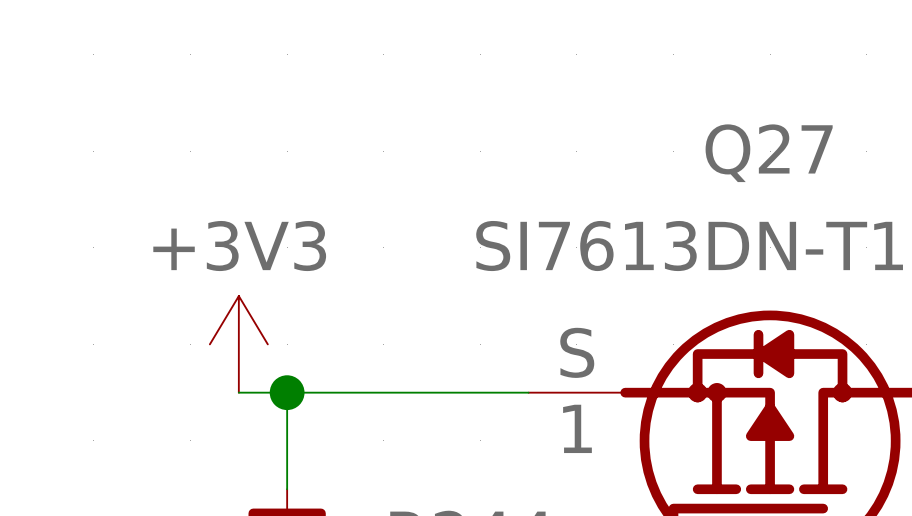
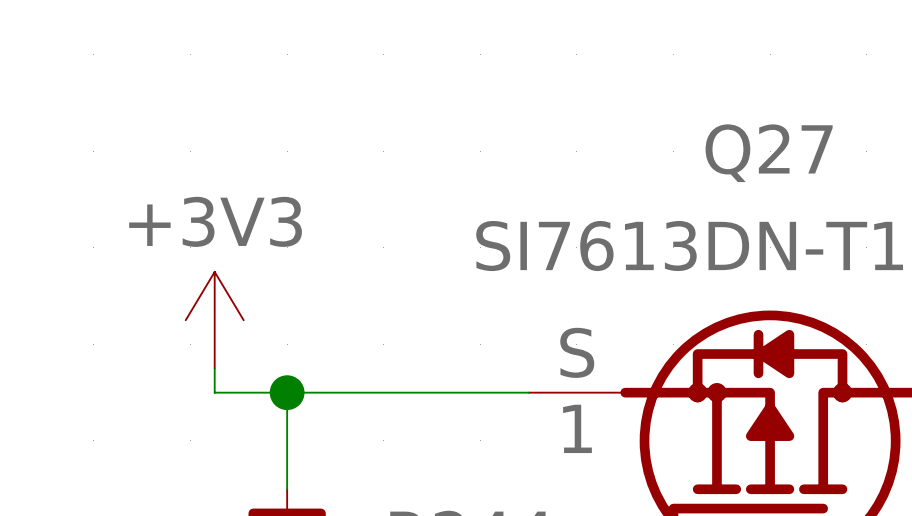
power symbol position: +3V3 (238, 344) -> +3V3 (214, 320)
wire: none -> (214, 368) (214, 392) (238, 392)

